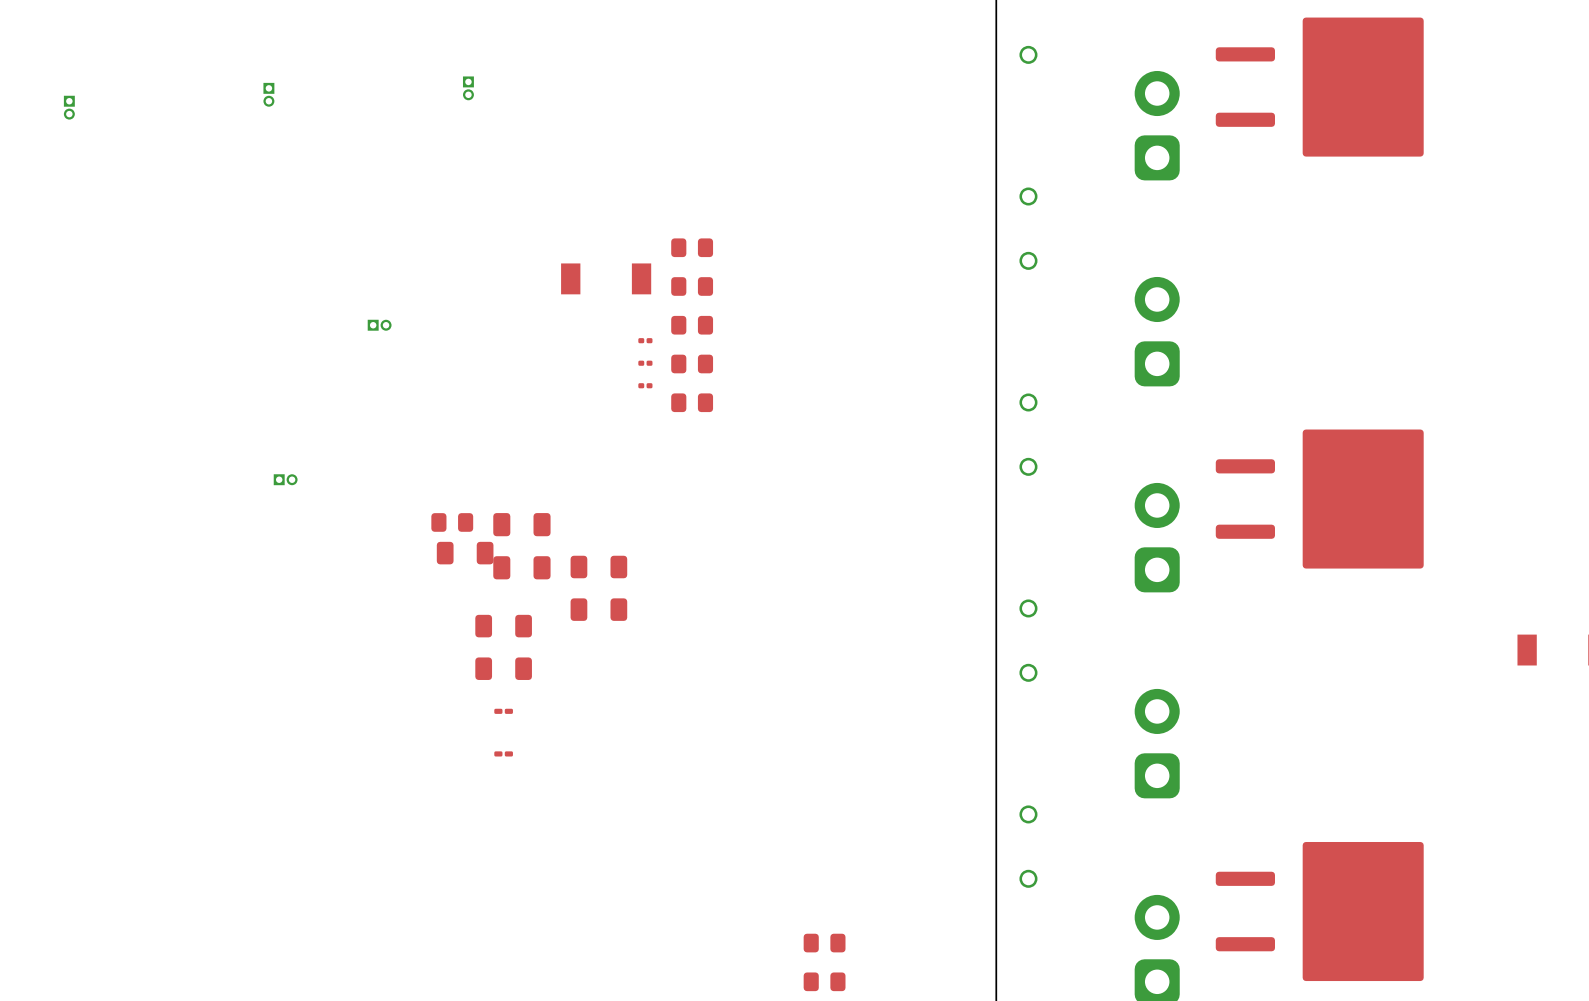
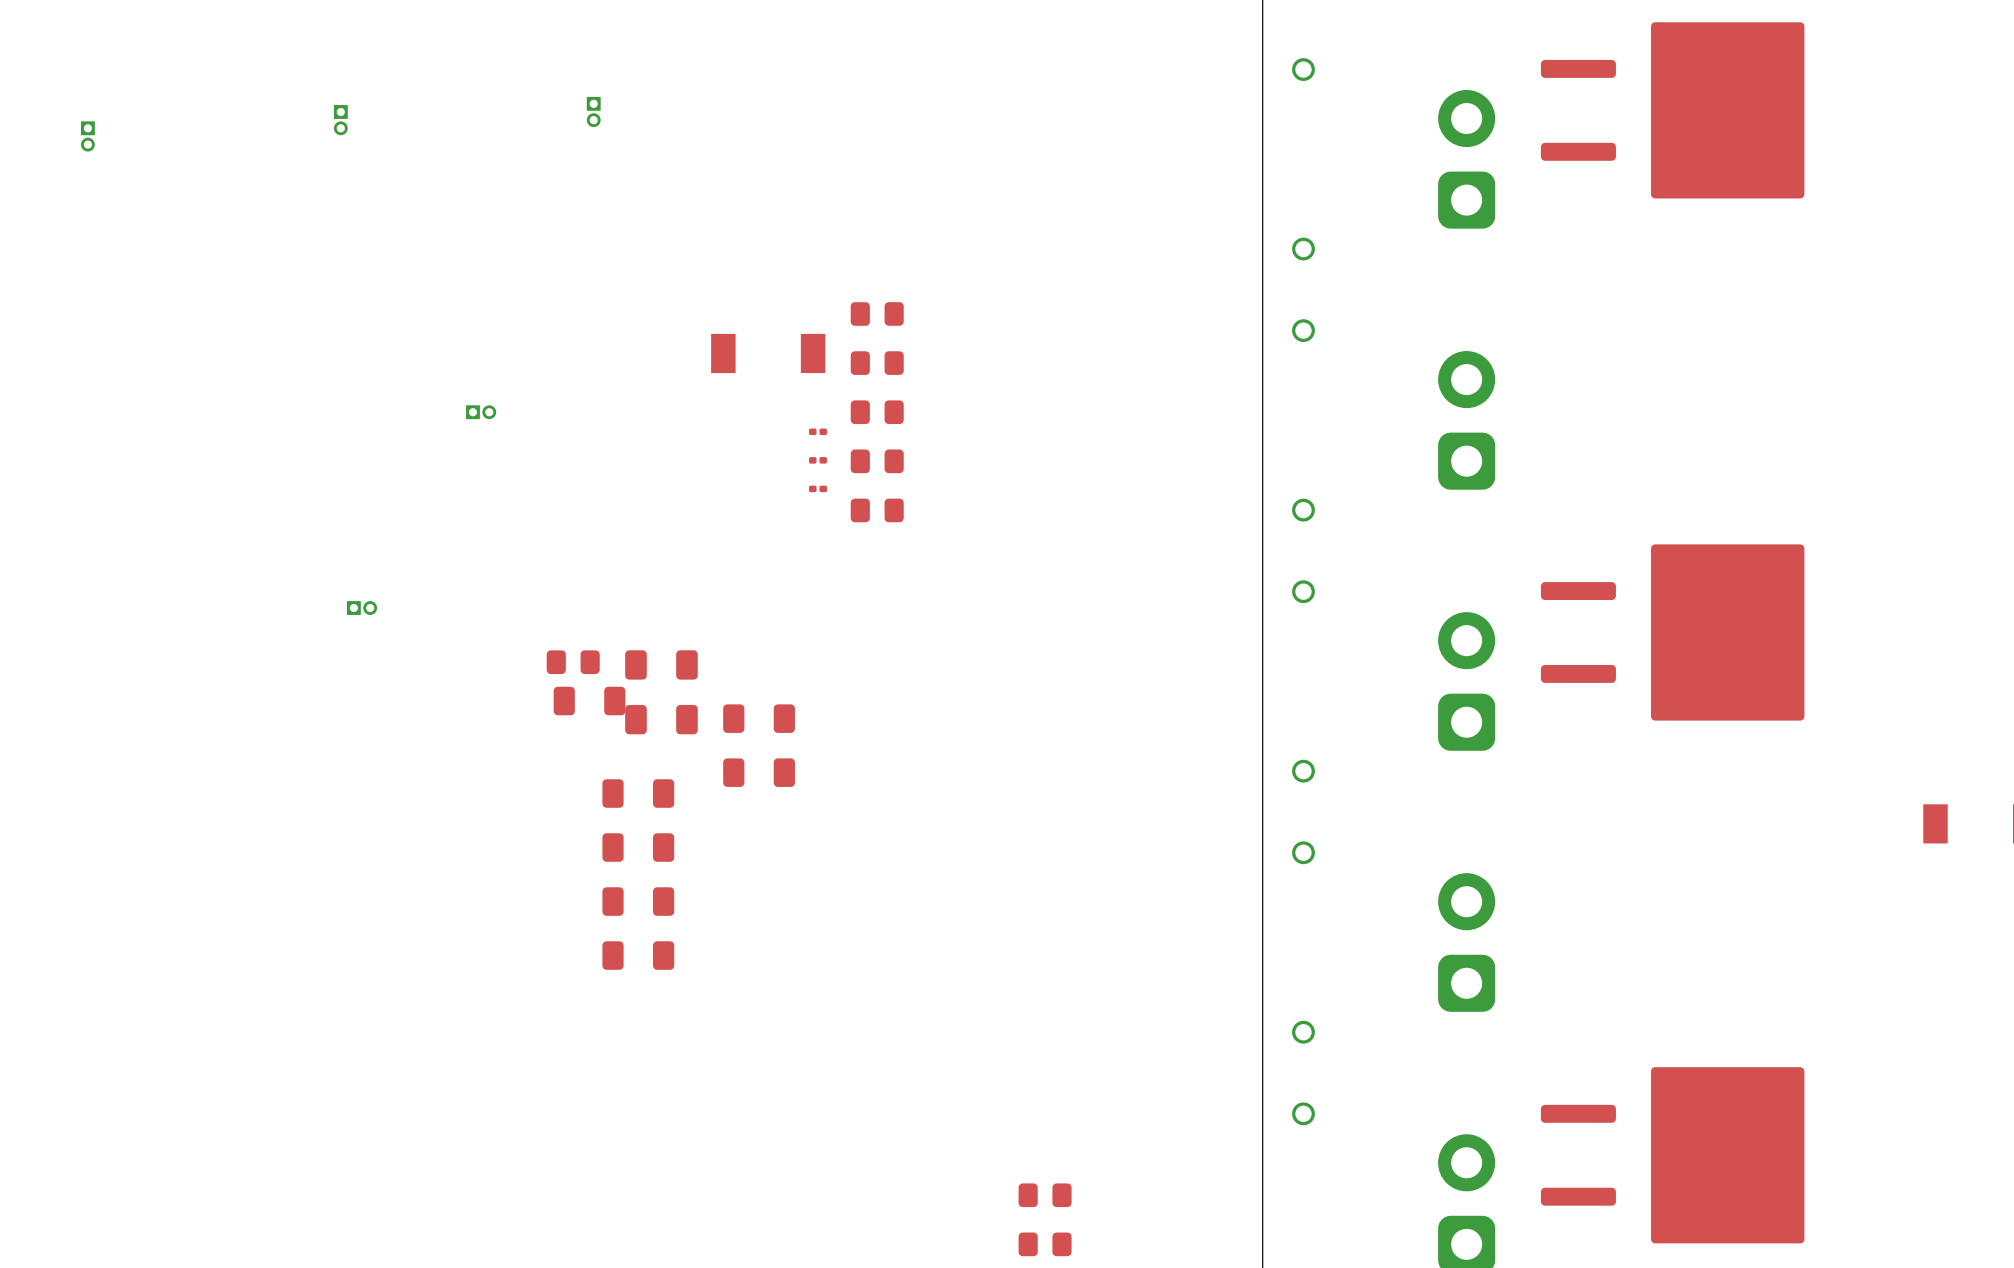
part footprint: [494, 708, 513, 714] -> [602, 887, 675, 916]
part footprint: [494, 751, 513, 757] -> [602, 941, 675, 970]

